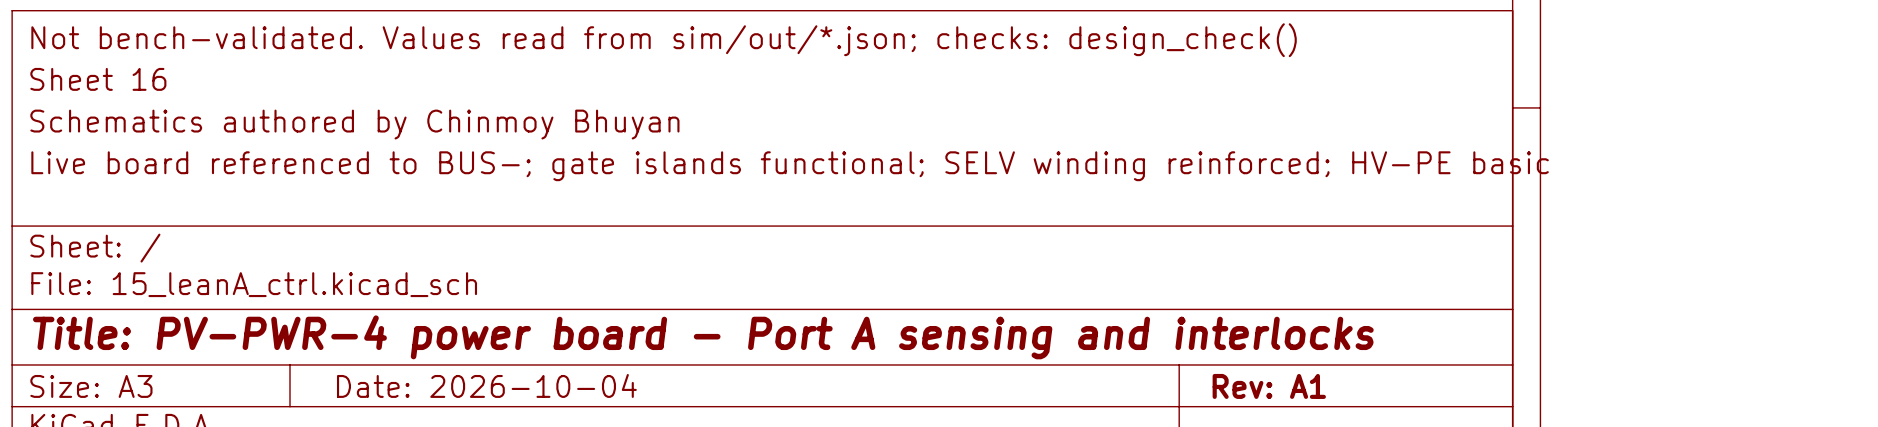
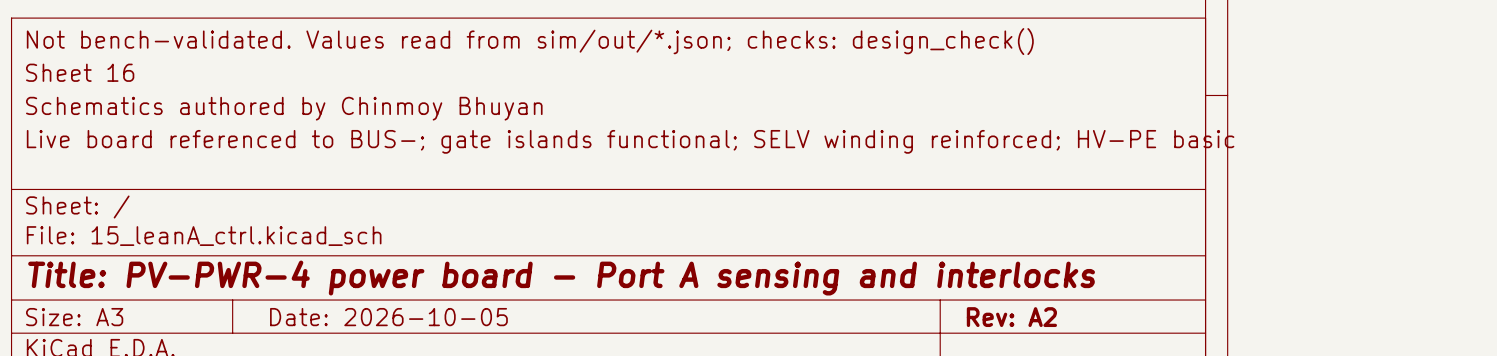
title block: Date: 2026-10-04 (486, 385) -> Date: 2026-10-05 (388, 317)
title block: Rev: A1 (1269, 386) -> Rev: A2 (1011, 317)

